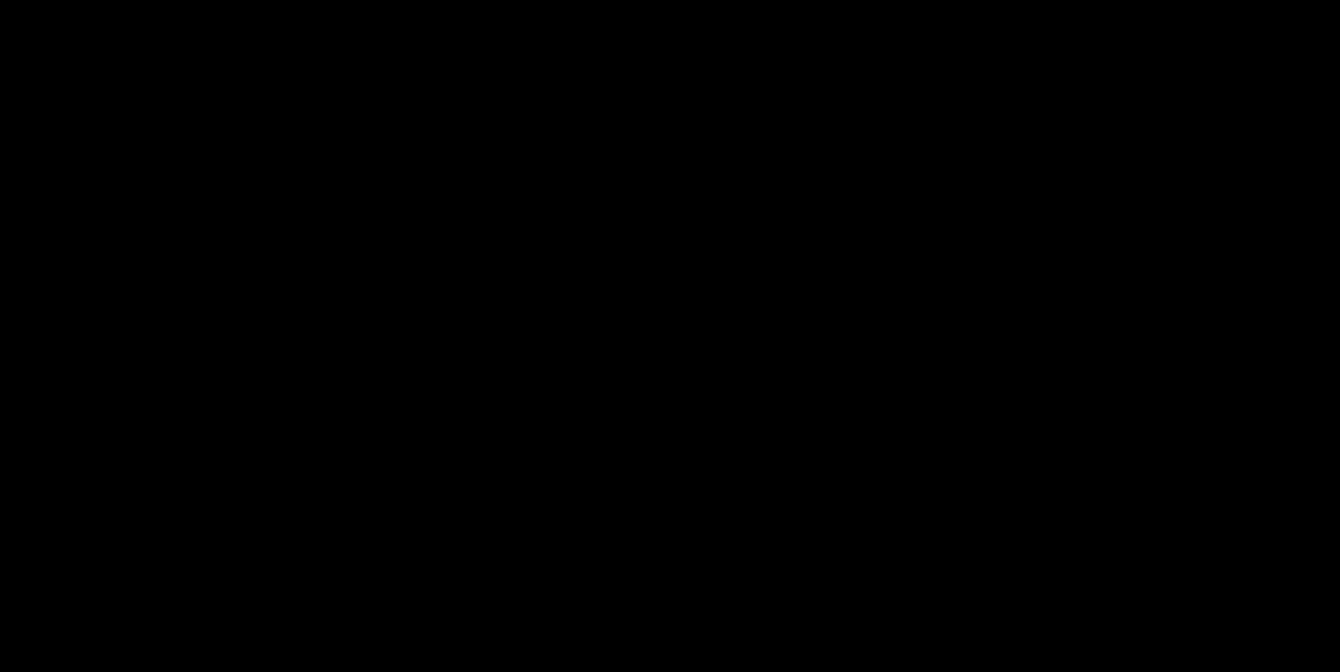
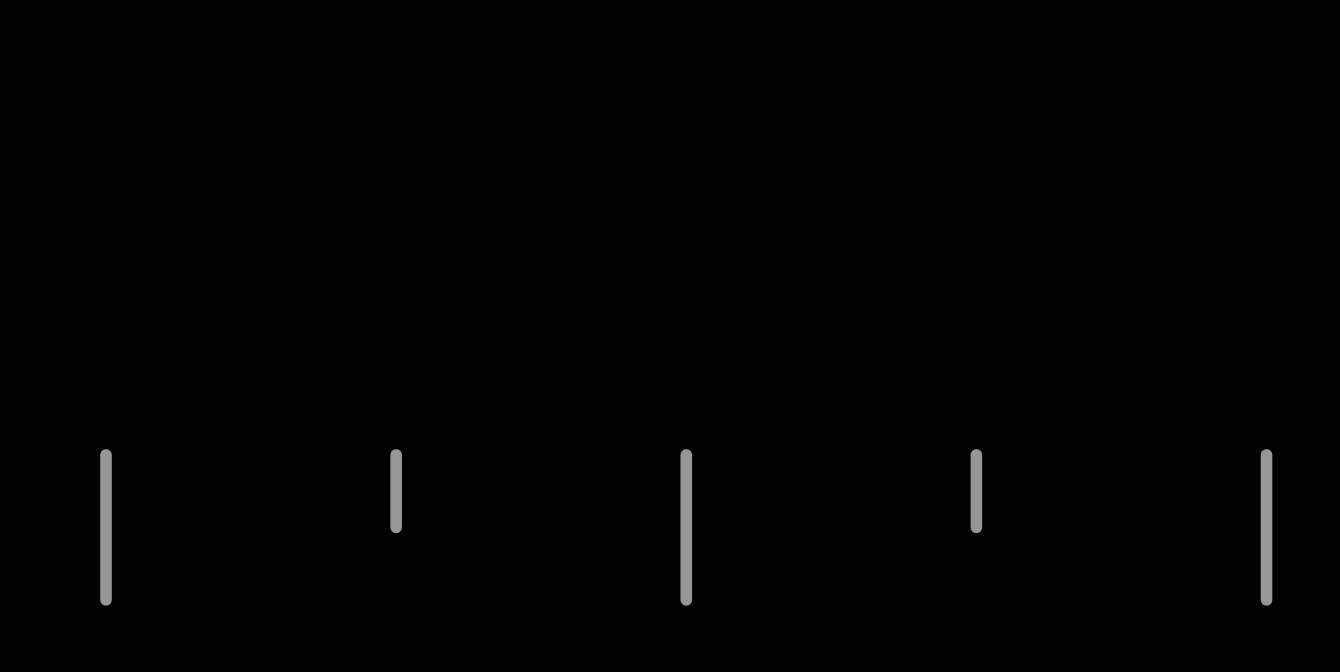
line: none -> (106, 454) (106, 599)
line: none -> (396, 454) (396, 527)
line: none -> (686, 454) (686, 599)
line: none -> (976, 454) (976, 527)
line: none -> (1266, 454) (1266, 599)

